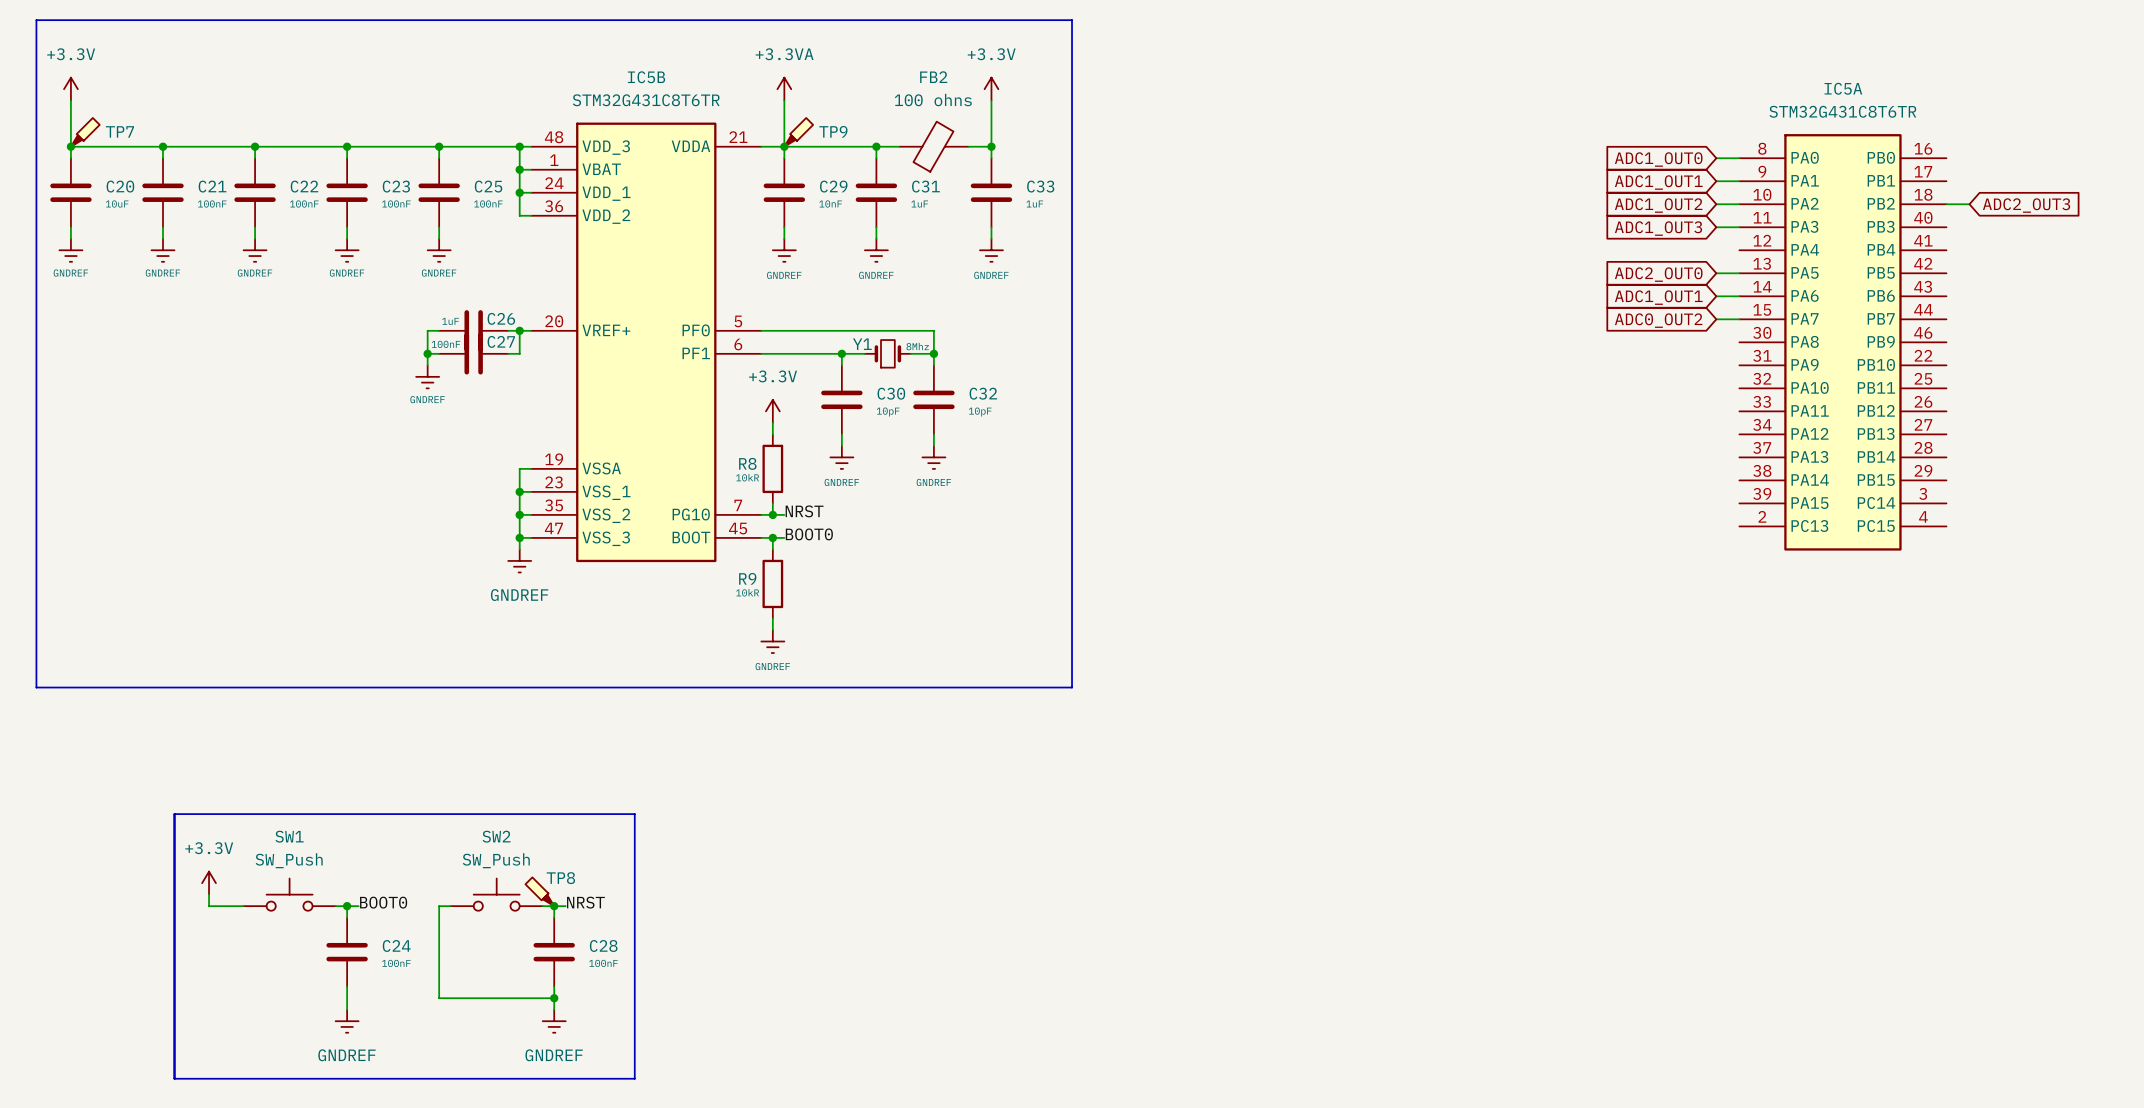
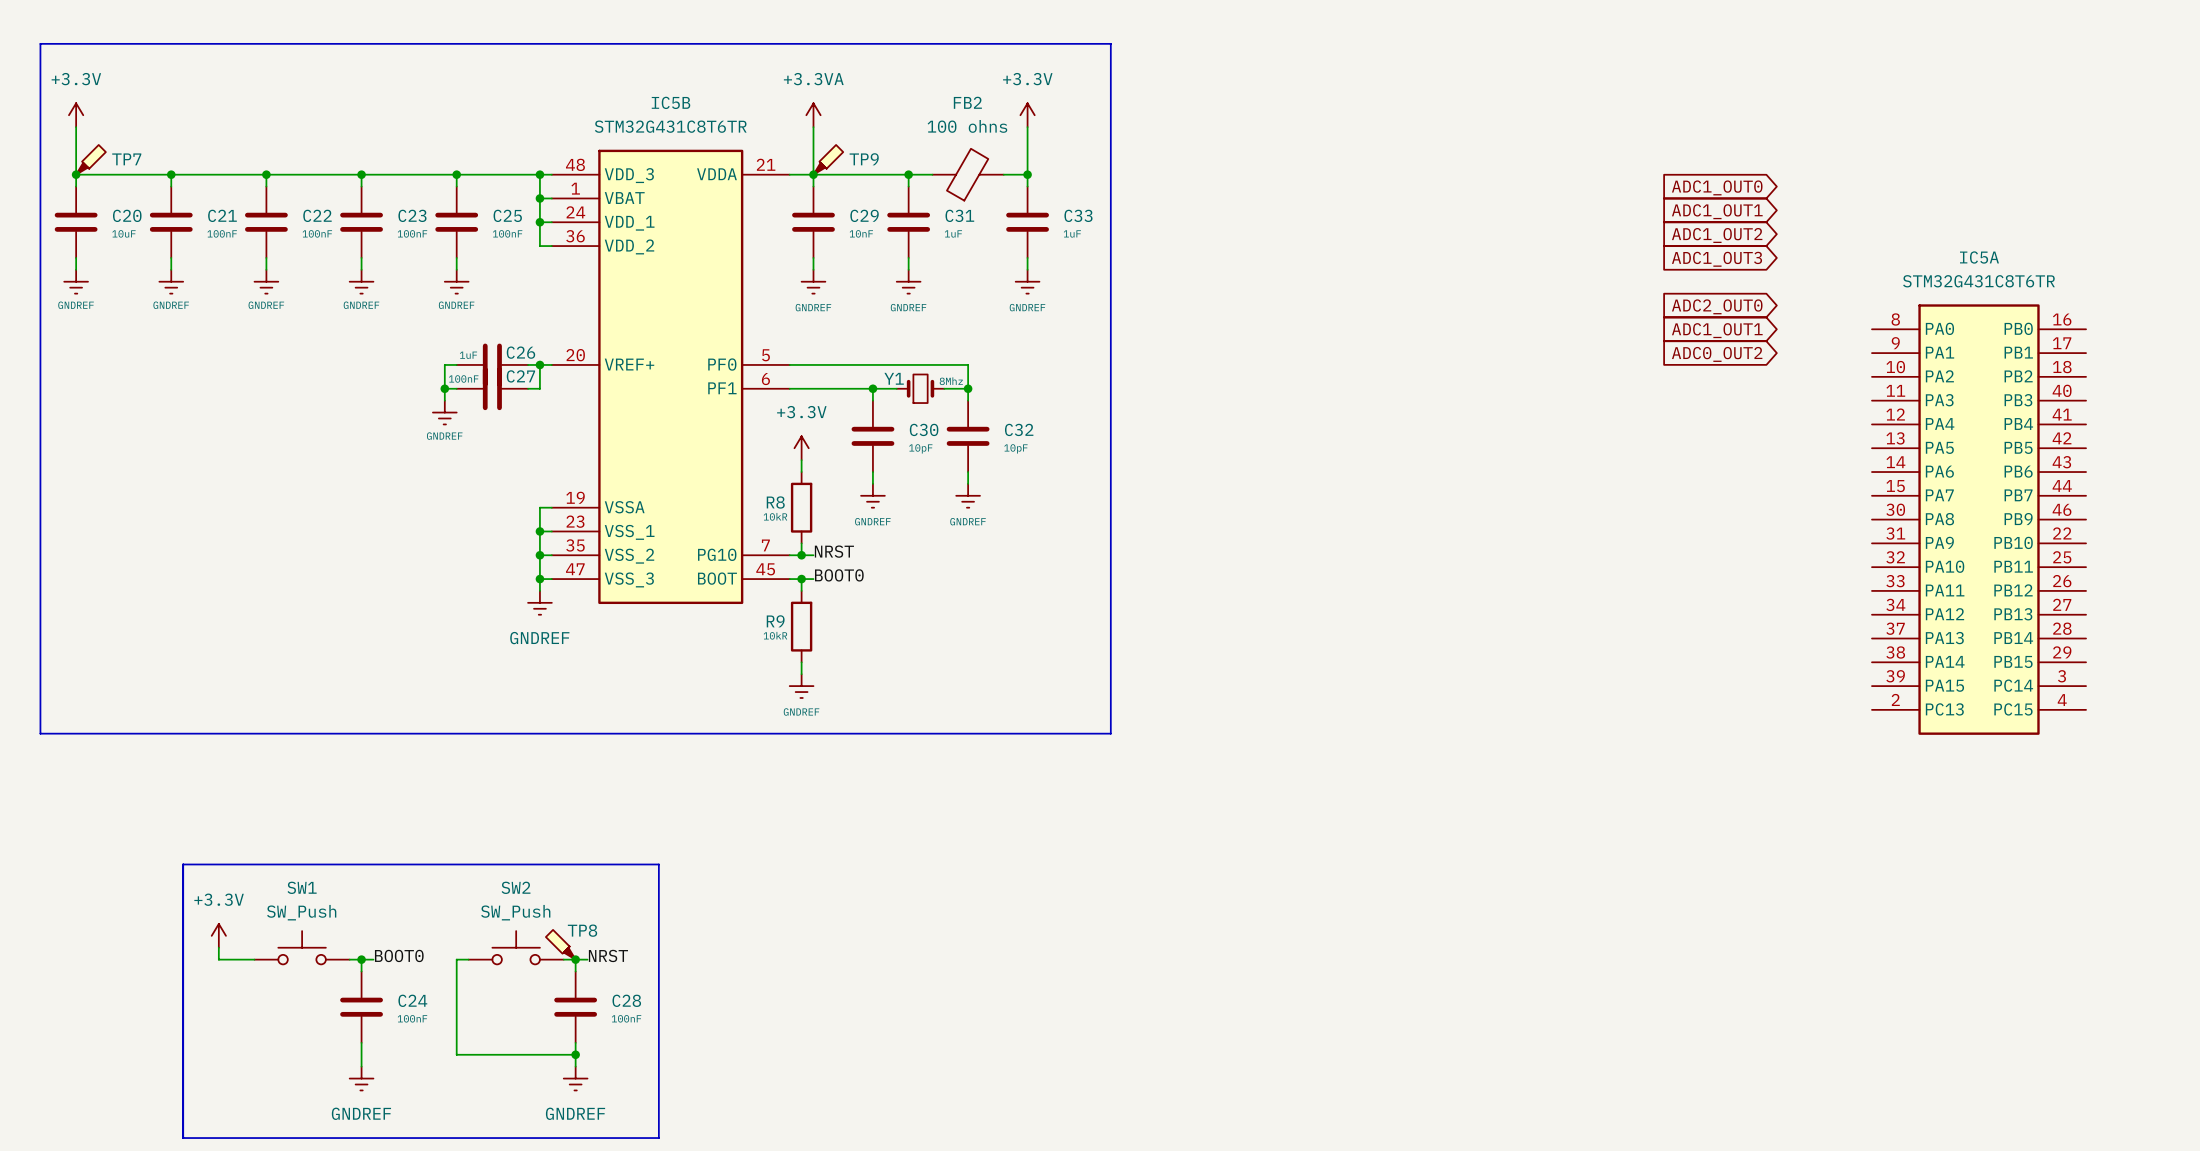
wire: (1716, 158) (1739, 158) -> none
wire: (1716, 181) (1739, 181) -> none
wire: (1716, 204) (1739, 204) -> none
wire: (1946, 204) (1969, 204) -> none
global label: ADC2_OUT3 (2026, 205) -> none
wire: (1716, 227) (1739, 227) -> none
wire: (1716, 273) (1739, 273) -> none
wire: (1716, 296) (1739, 296) -> none
wire: (1716, 319) (1739, 319) -> none
IC5A position: (1842, 342) -> (1979, 519)

